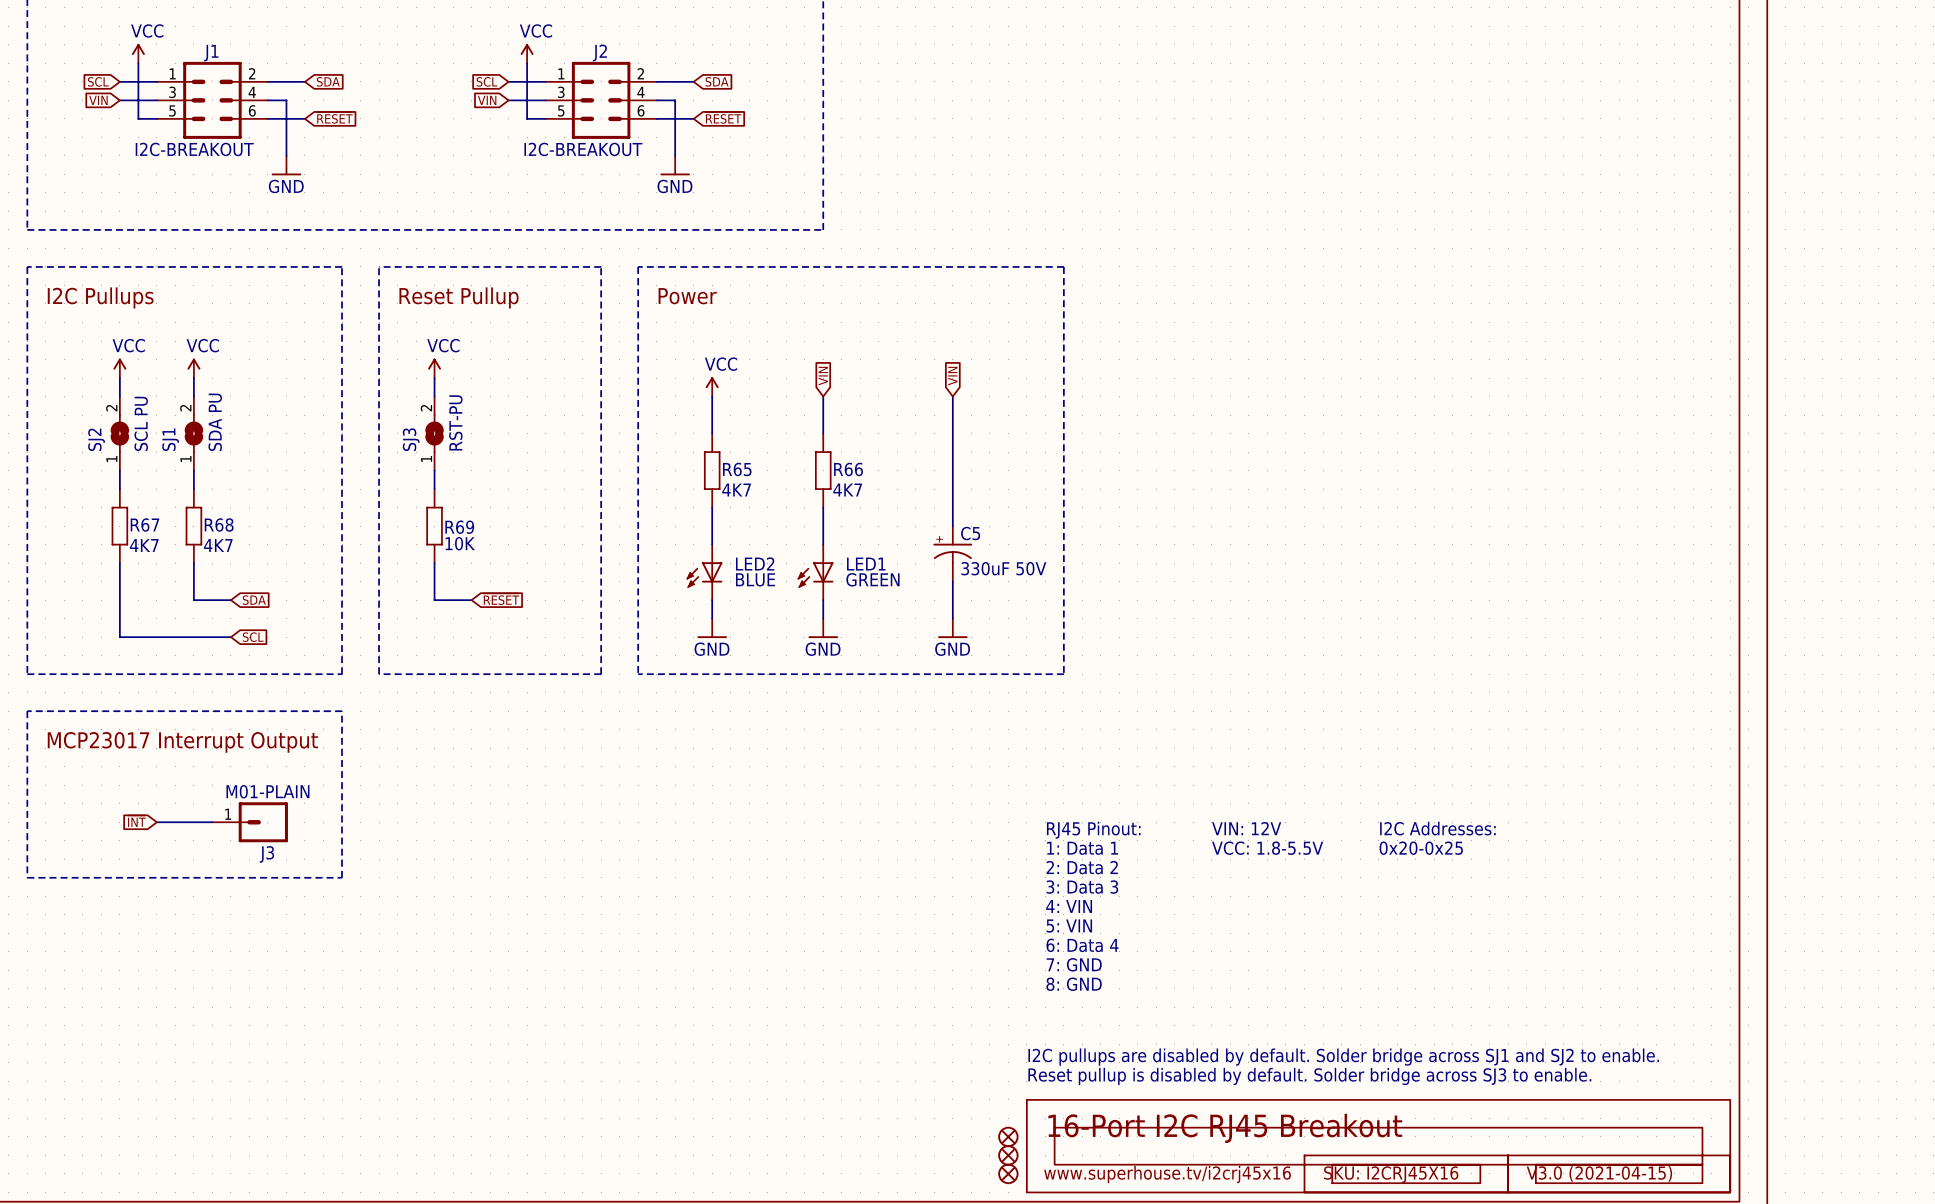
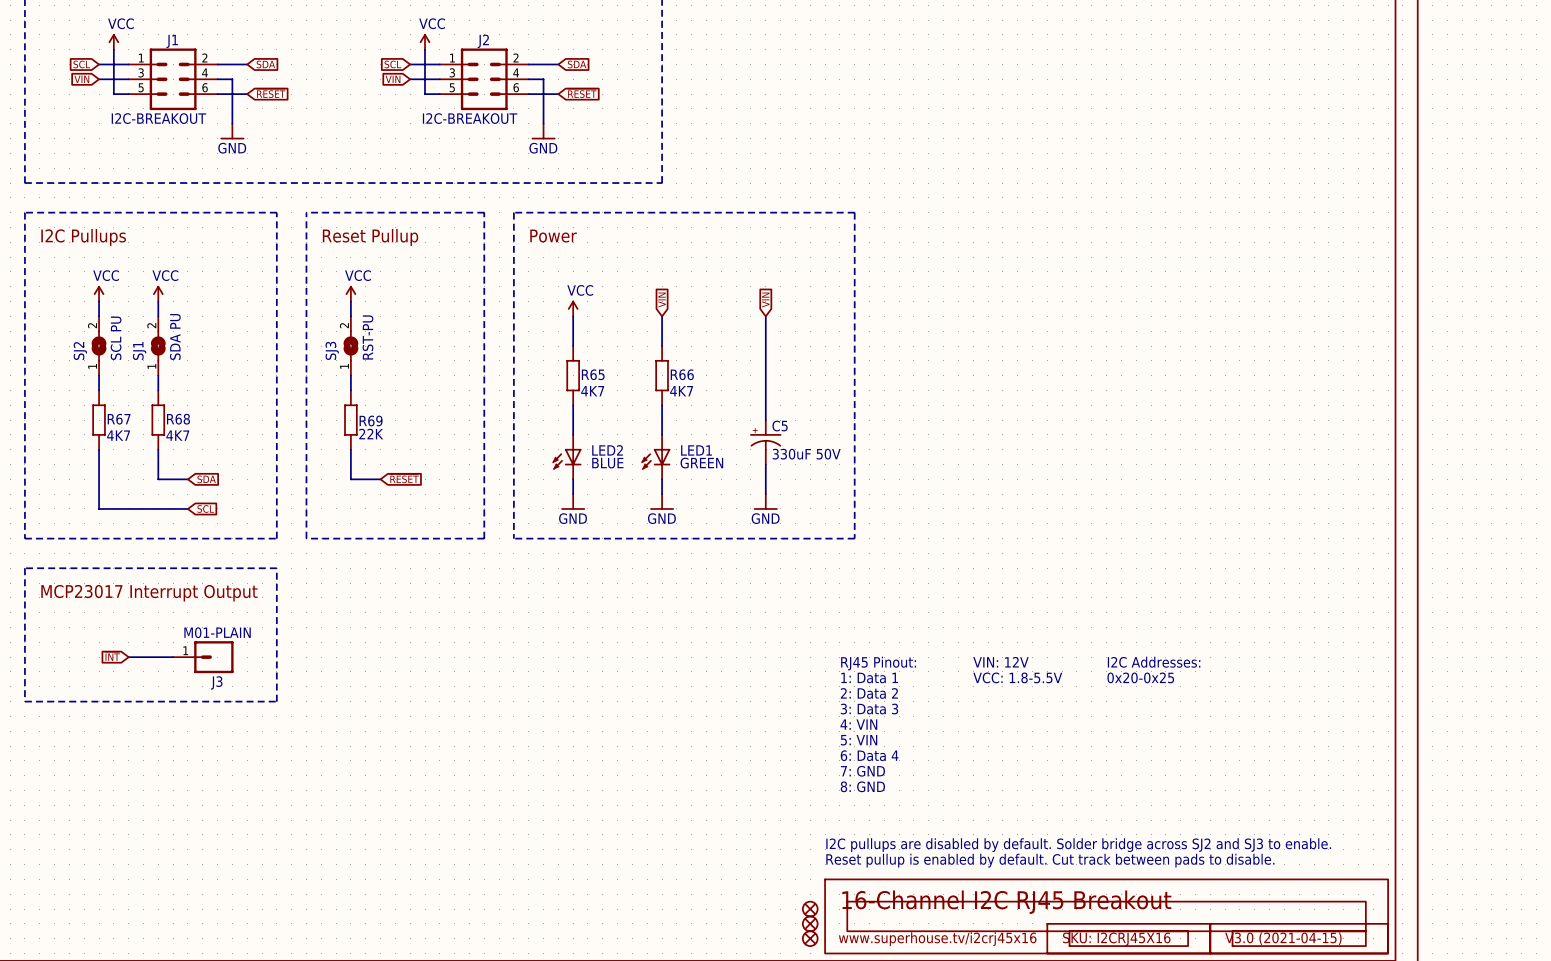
R69 value: 10K (460, 543) -> 22K (371, 434)
text: I2C pullups are disabled by default. Solder bridge across SJ1 and SJ2 to enable. (1343, 1057) -> I2C pullups are disabled by default. Solder bridge across SJ2 and SJ3 to enable. (1078, 845)
text: Reset pullup is disabled by default. Solder bridge across SJ3 to enable. (1309, 1076) -> Reset pullup is enabled by default. Cut track between pads to disable. (1050, 860)
text: 16-Port I2C RJ45 Breakout (1225, 1128) -> 16-Channel I2C RJ45 Breakout (1006, 902)

